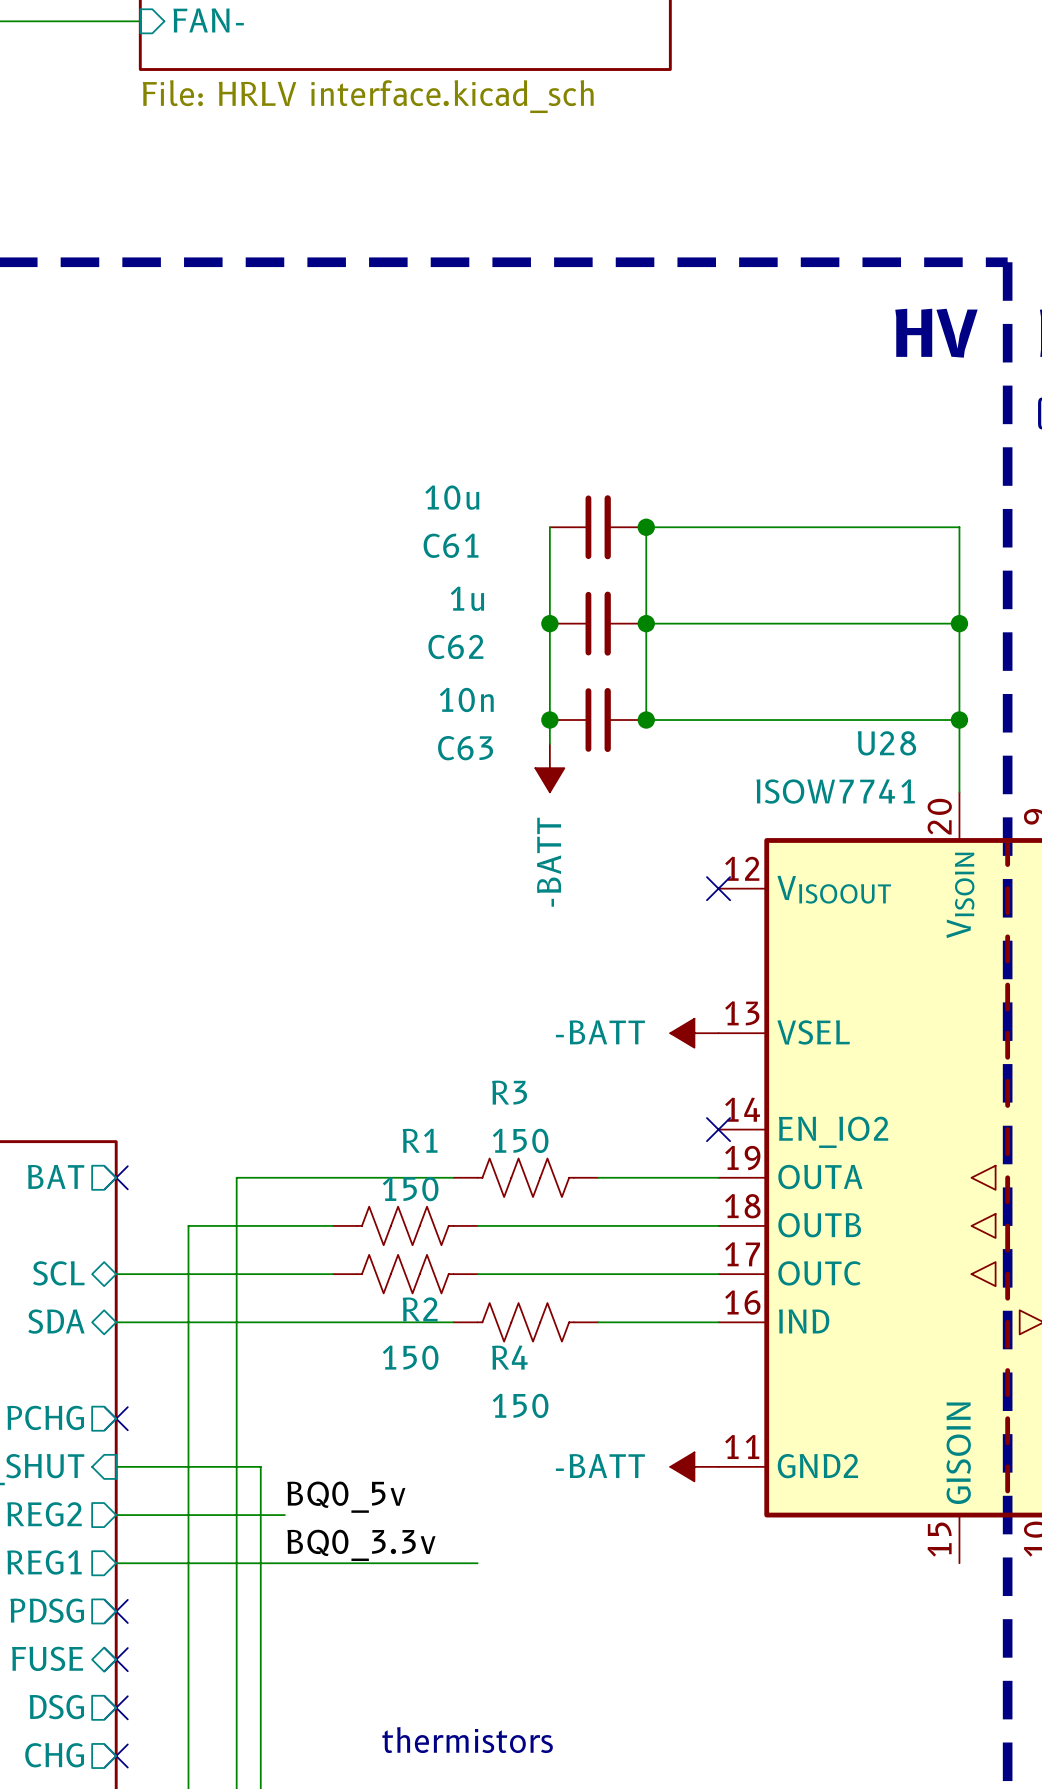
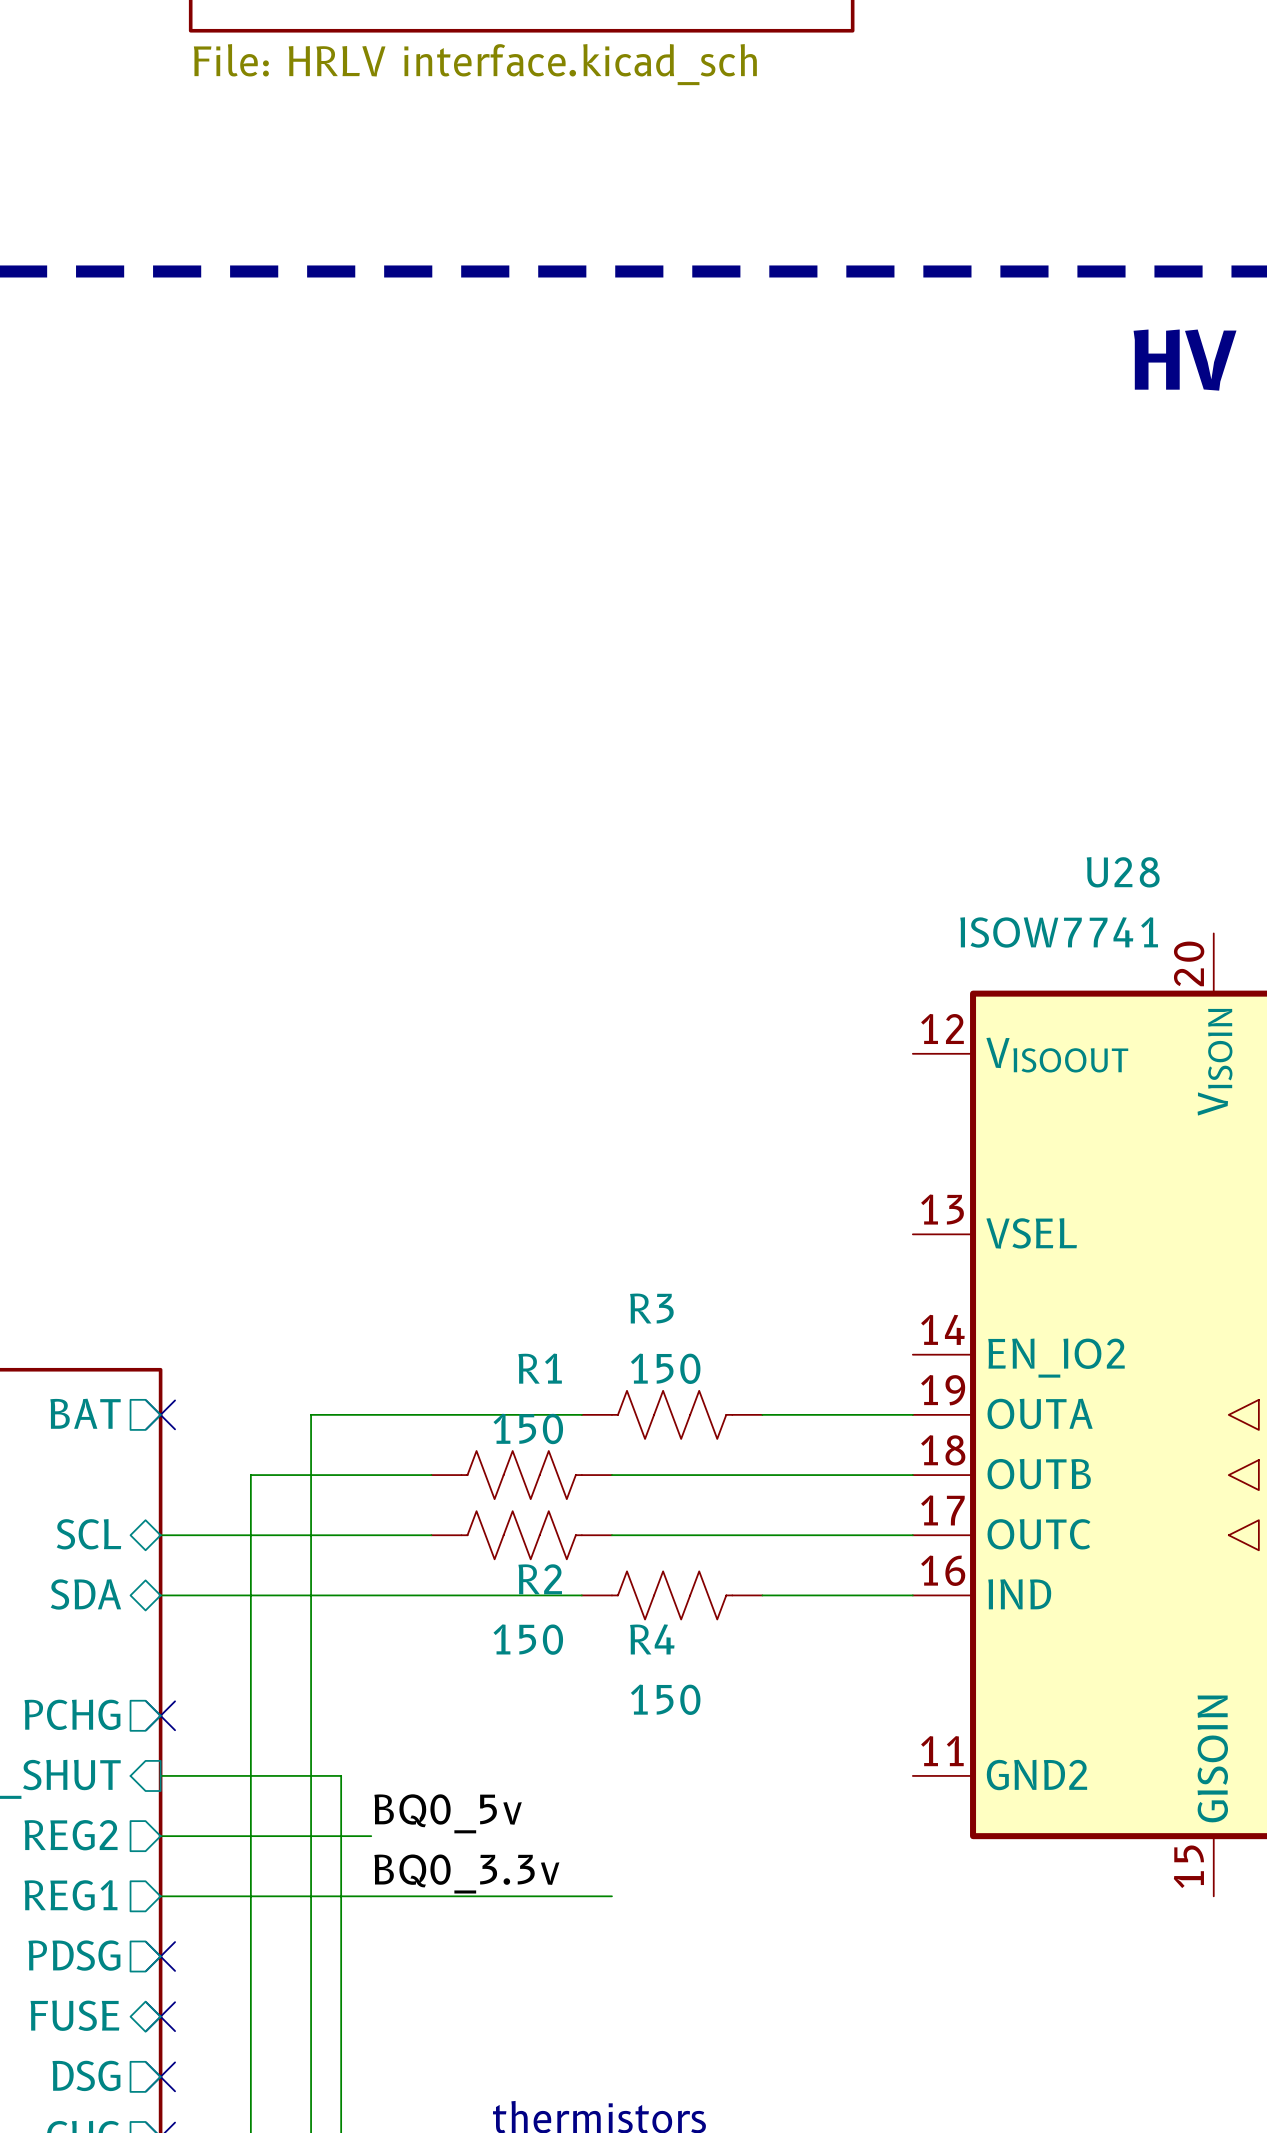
wire: (549, 527) (549, 744) -> none
C61: 10u (598, 527) -> none
junction: (646, 527) -> none
junction: (549, 623) -> none
C62: 1u (598, 623) -> none
wire: (646, 623) (959, 623) -> none
junction: (646, 623) -> none
junction: (959, 623) -> none
junction: (549, 720) -> none
C63: 10n (598, 720) -> none
junction: (646, 720) -> none
wire: (959, 720) (646, 720) (646, 527) (959, 527) (959, 792) -> none
junction: (959, 720) -> none
power symbol: -BATT (549, 768) -> none
no-connect mark: (718, 888) -> none
power symbol: -BATT (694, 1033) -> none
no-connect mark: (718, 1129) -> none
power symbol: -BATT (694, 1466) -> none

